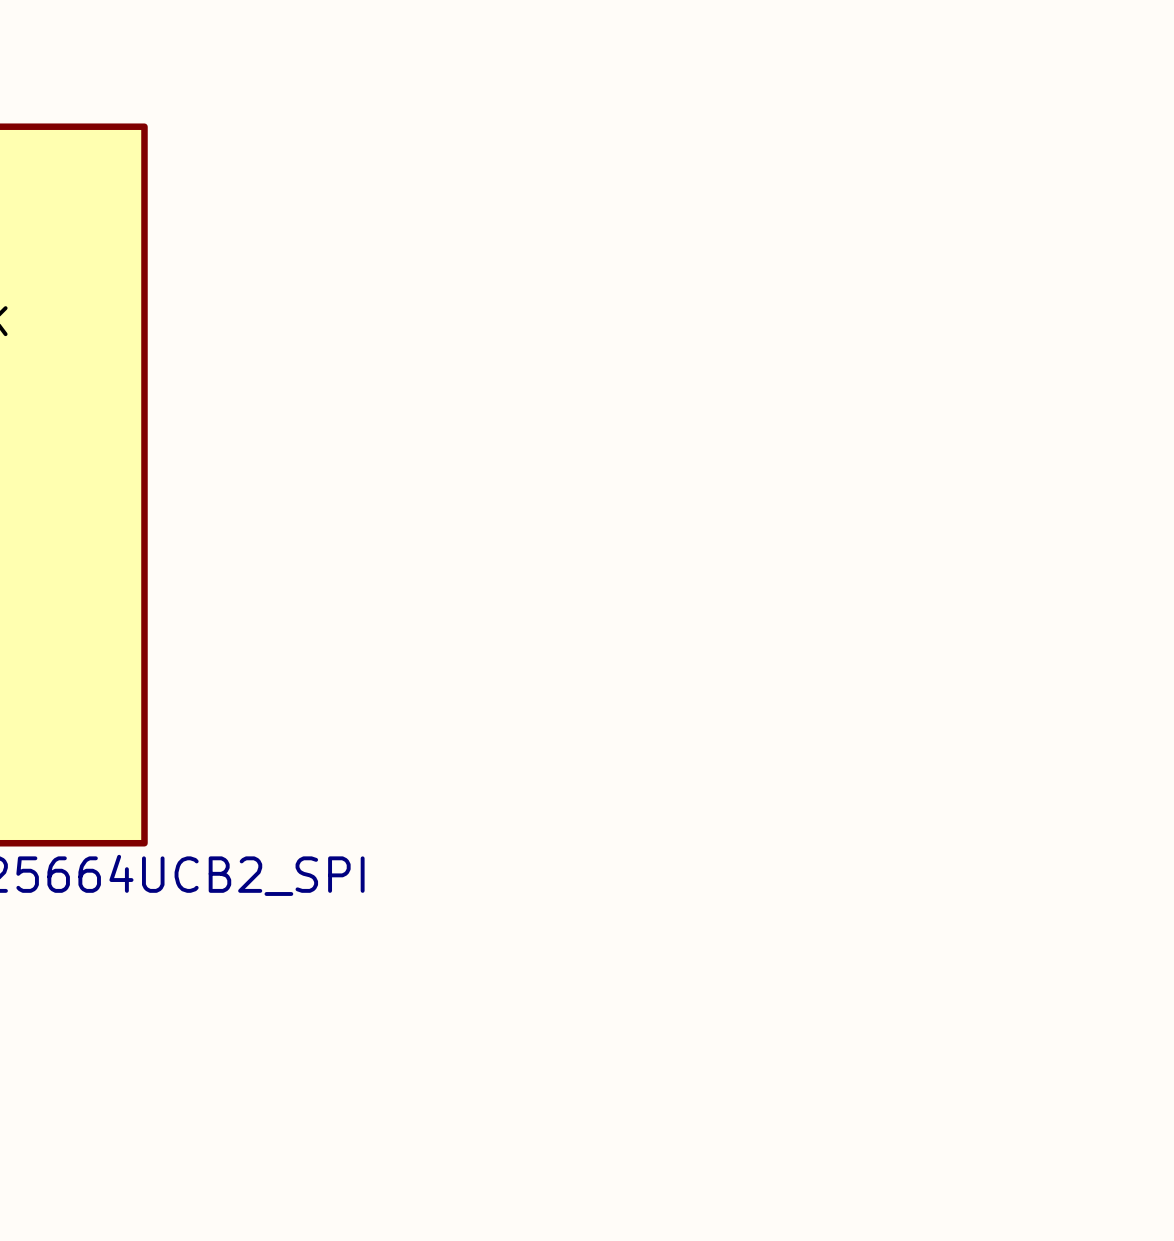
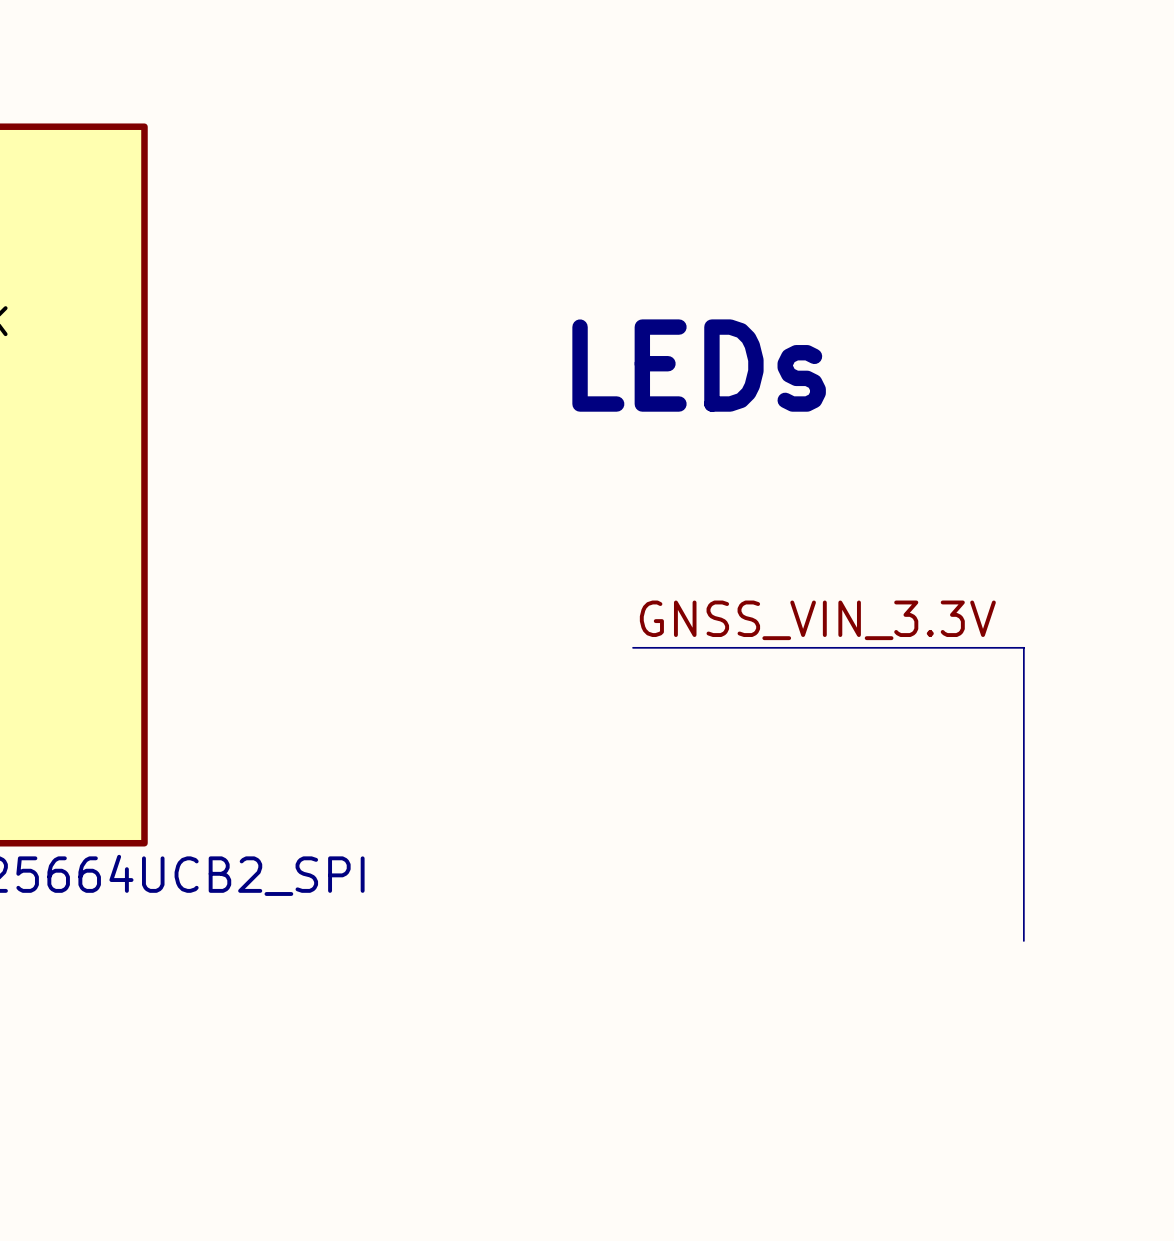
text: none -> LEDs (699, 365)
label: none -> GNSS_VIN_3.3V (817, 620)
wire: none -> (633, 647) (1023, 647) (1023, 940)

